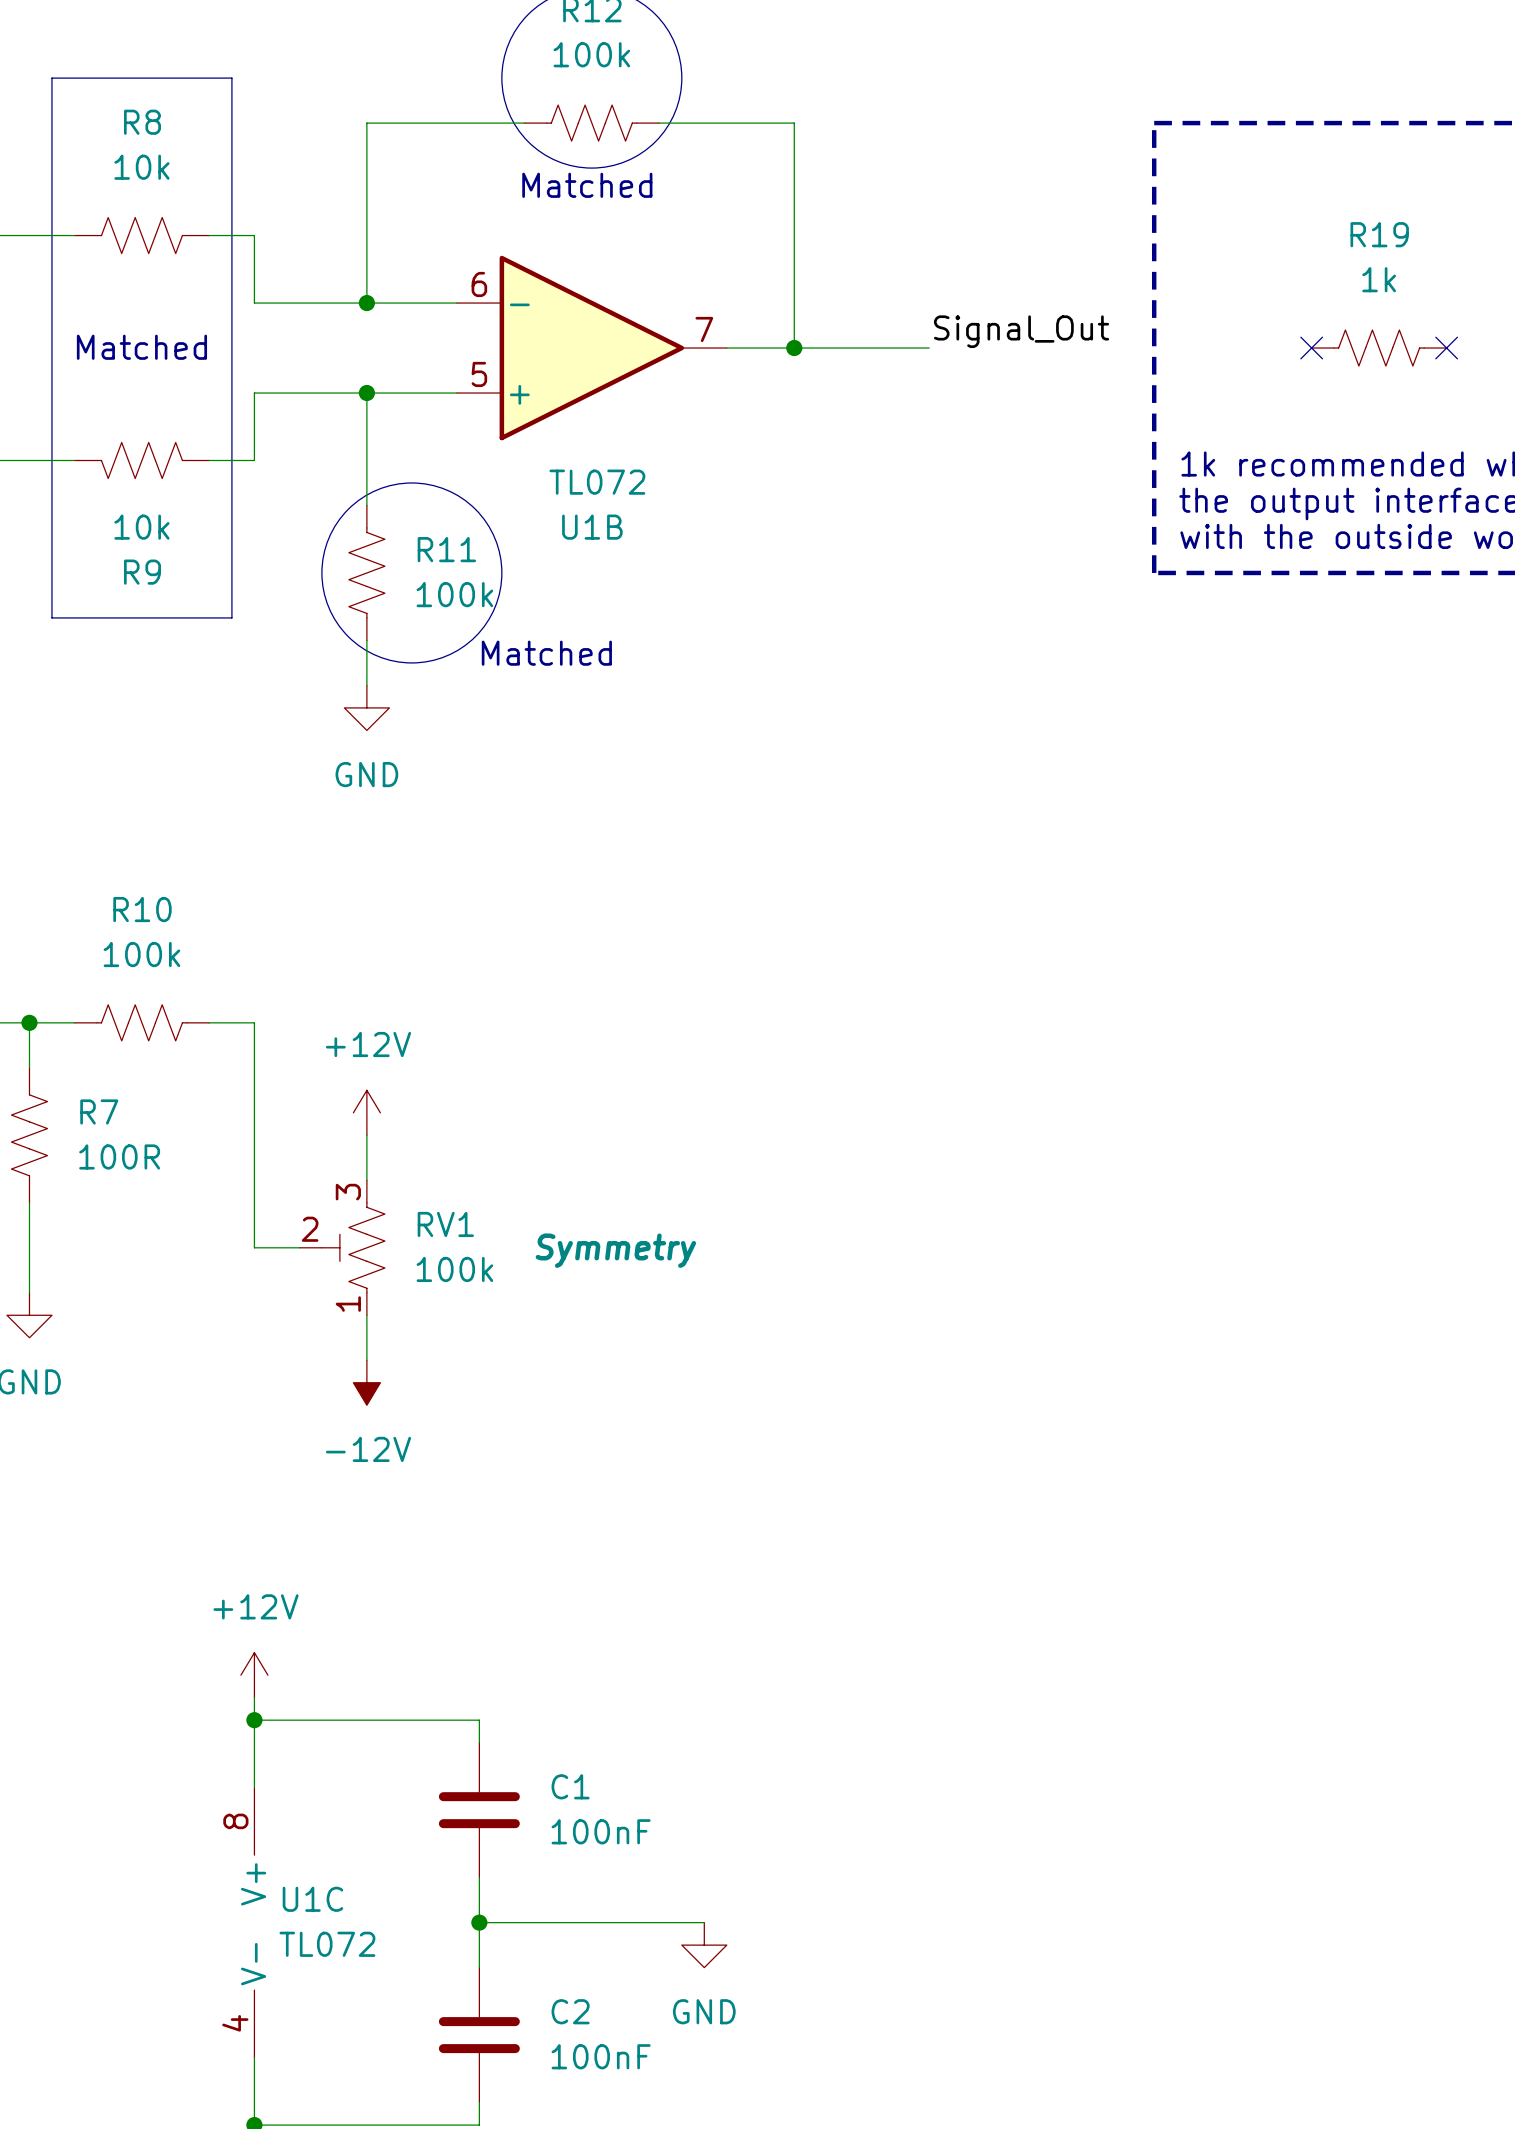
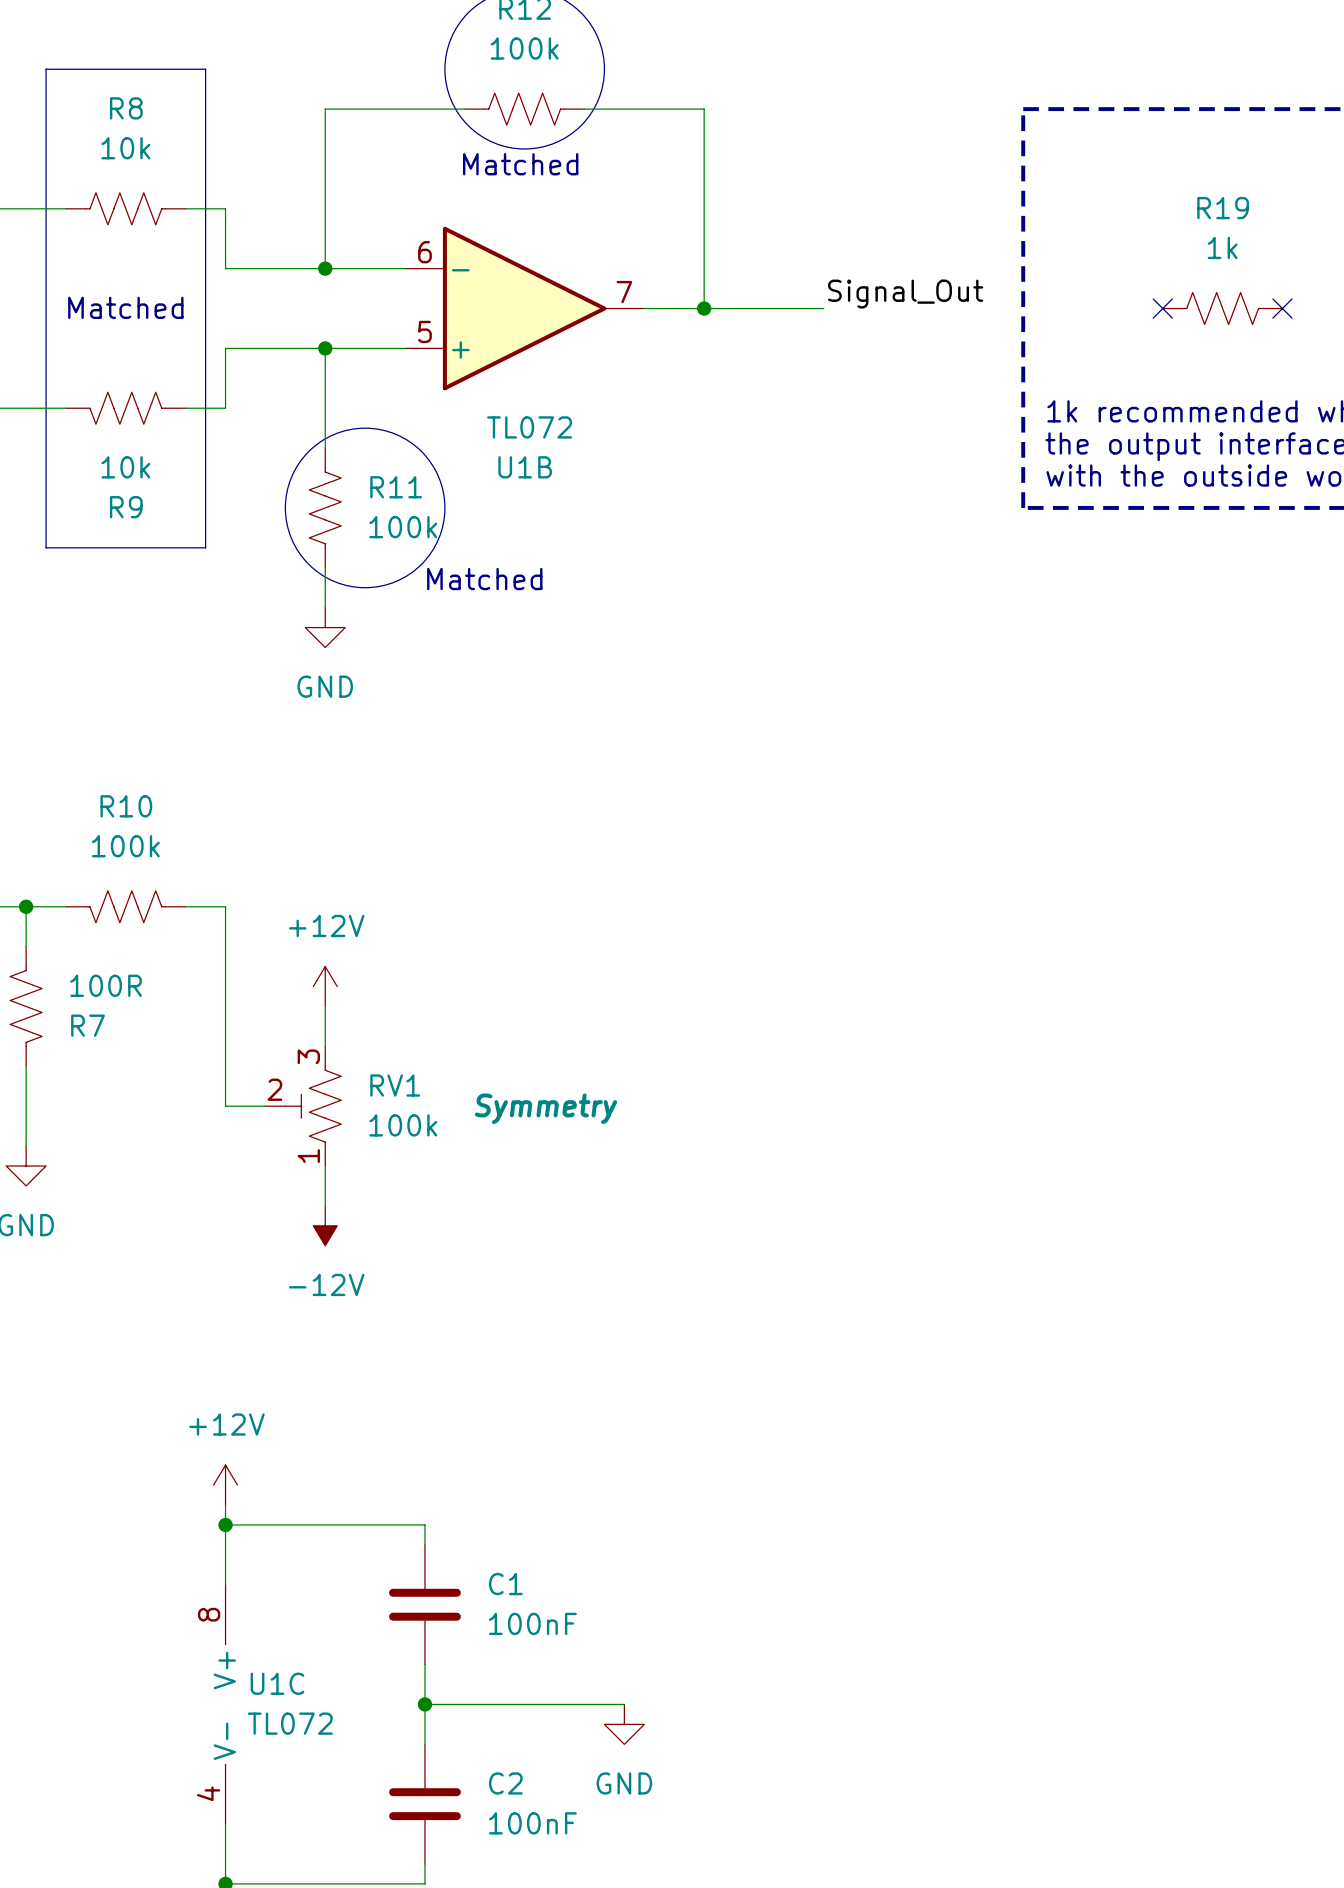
R10 flip: as is (141, 1022) -> left-right (125, 906)
R7 name position: R7 (99, 1111) -> R7 (88, 1025)
R7 flip: as is (29, 1135) -> left-right (26, 1006)
R7 value position: 100R (119, 1156) -> 100R (106, 985)

